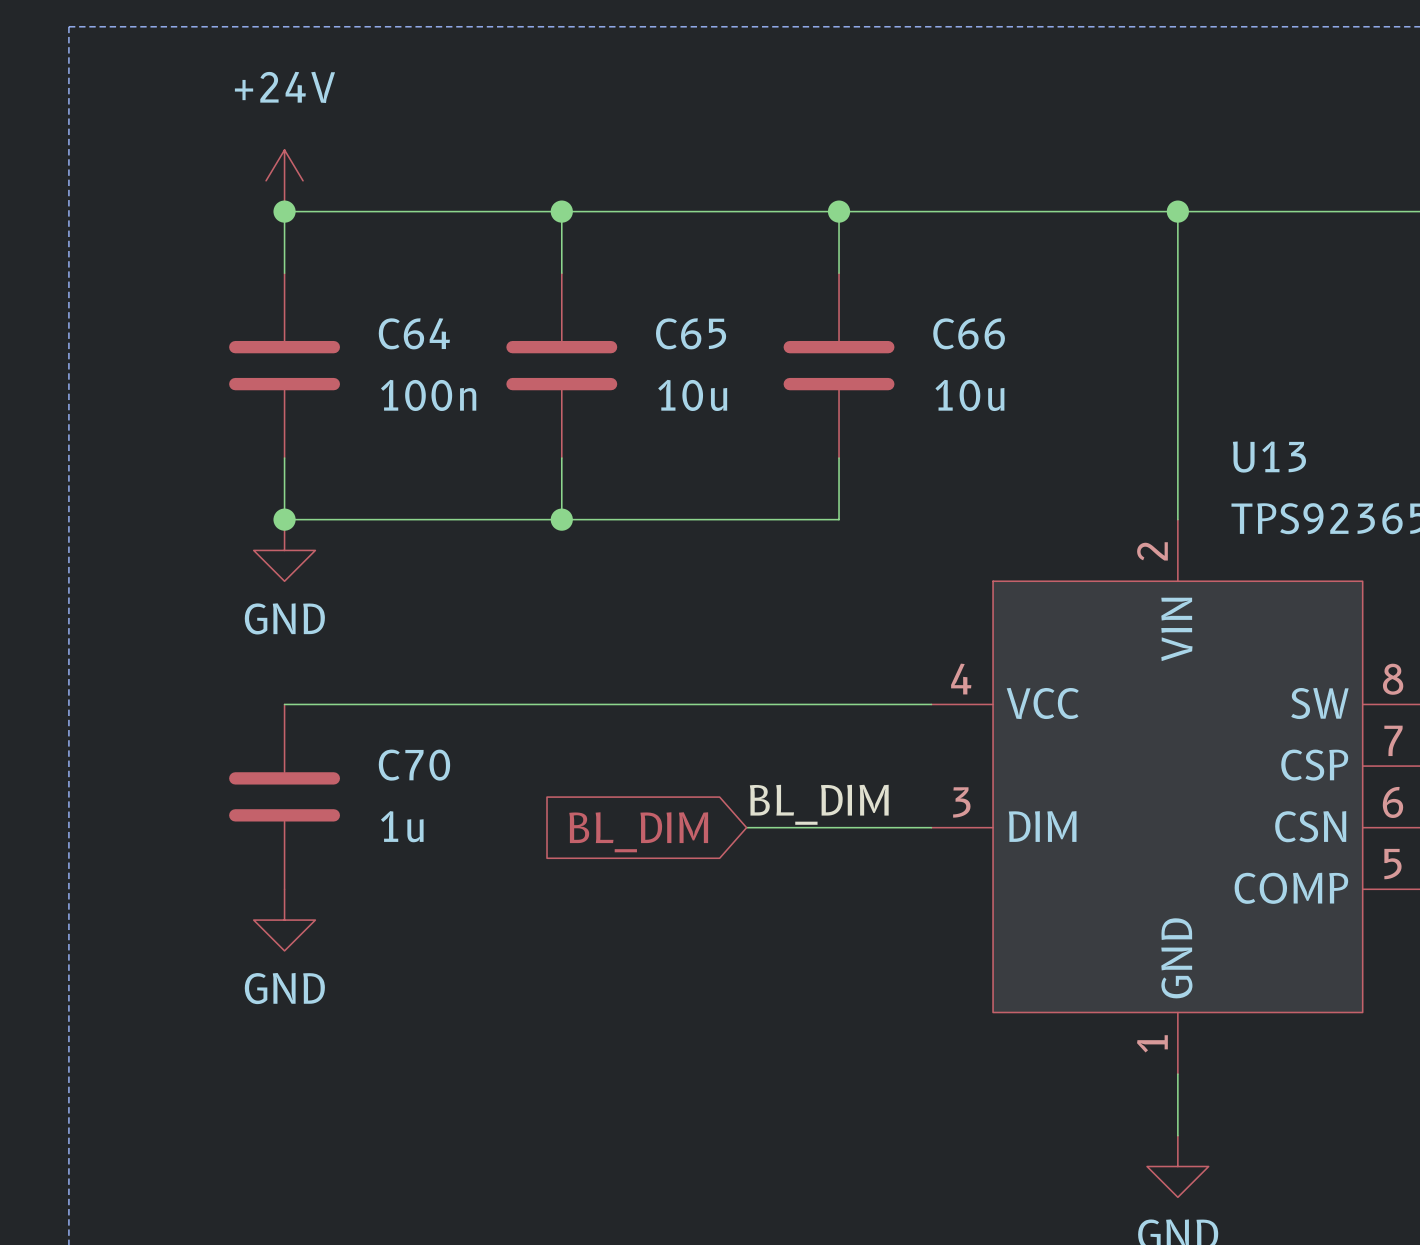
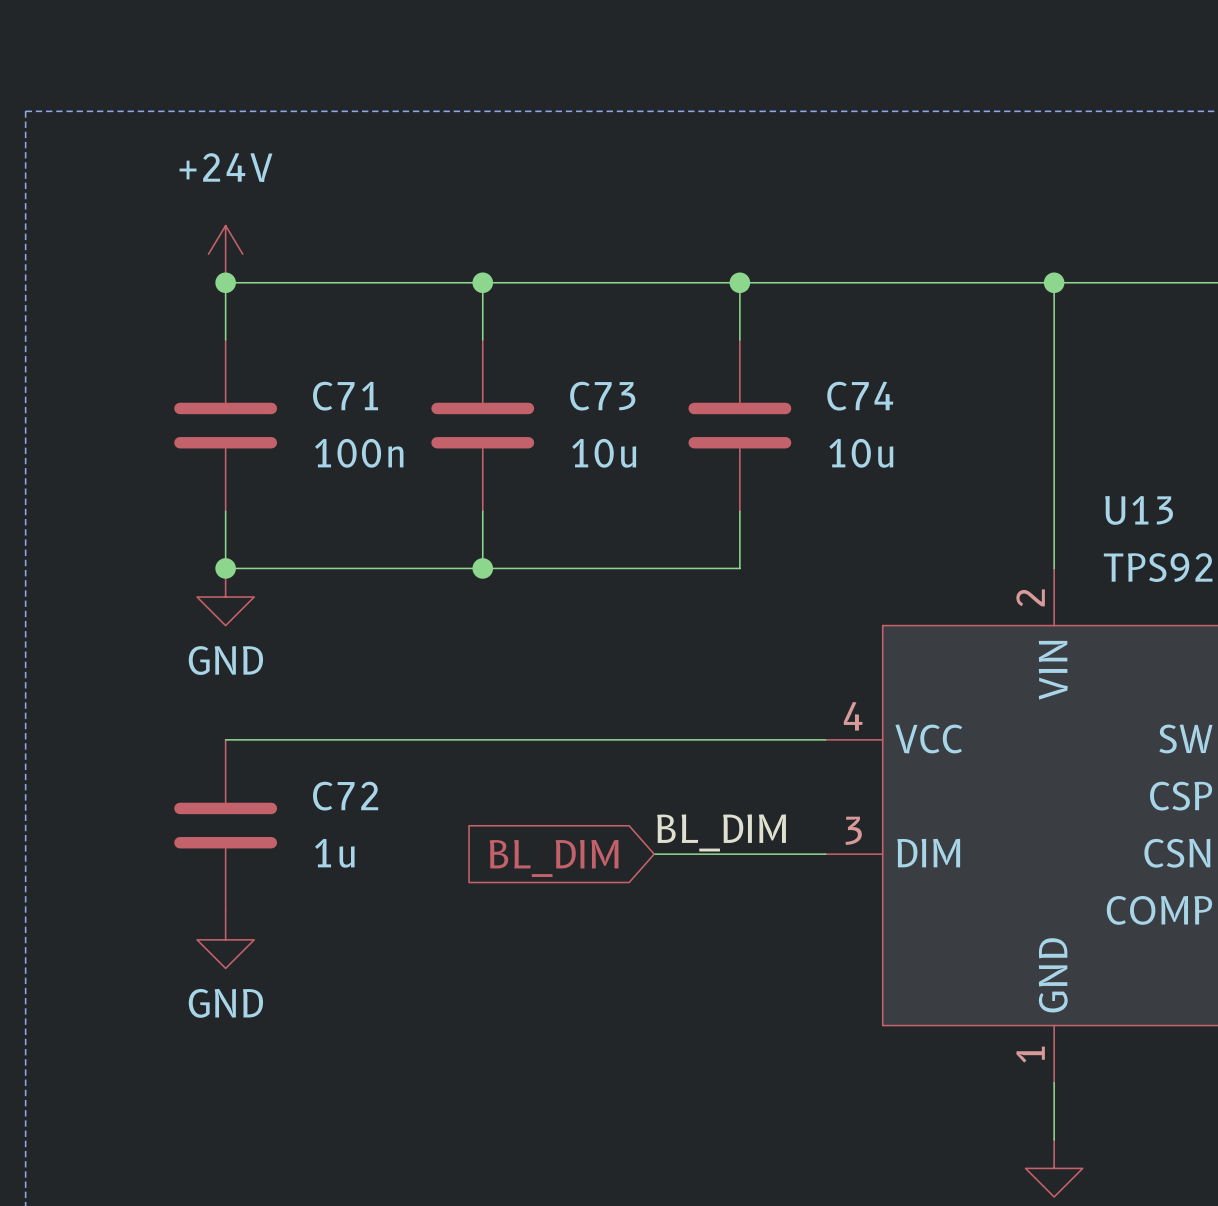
C64 name: C64 (414, 333) -> C71 (345, 396)
C65 name: C65 (691, 333) -> C73 (602, 396)
C66 name: C66 (969, 333) -> C74 (860, 396)
C70 name: C70 (414, 765) -> C72 (345, 796)

